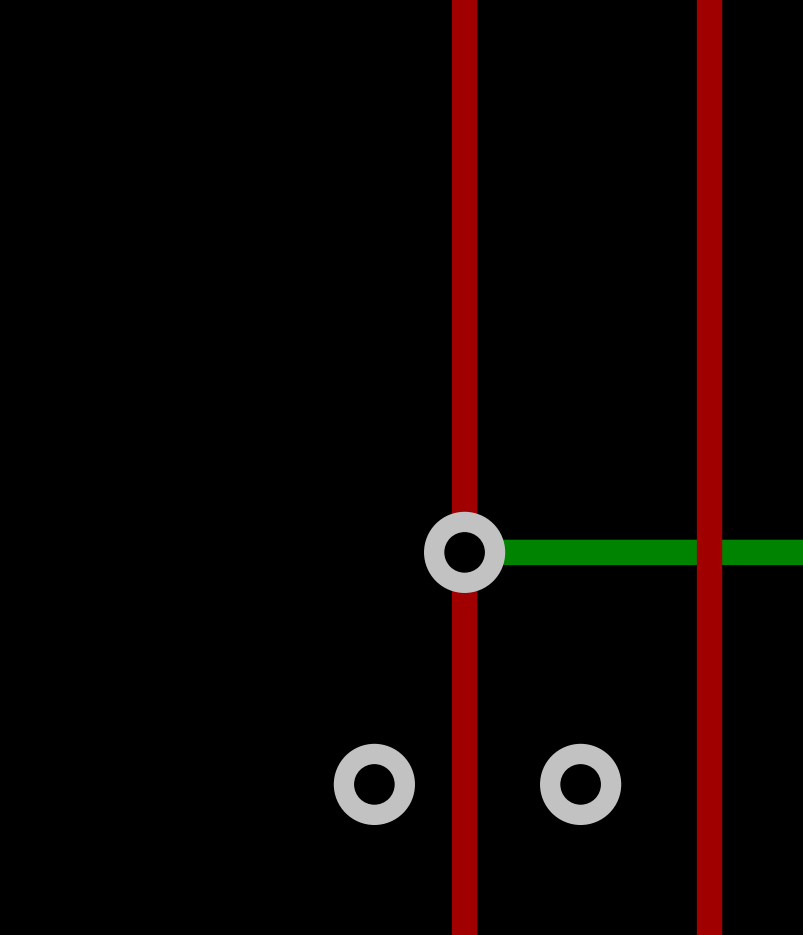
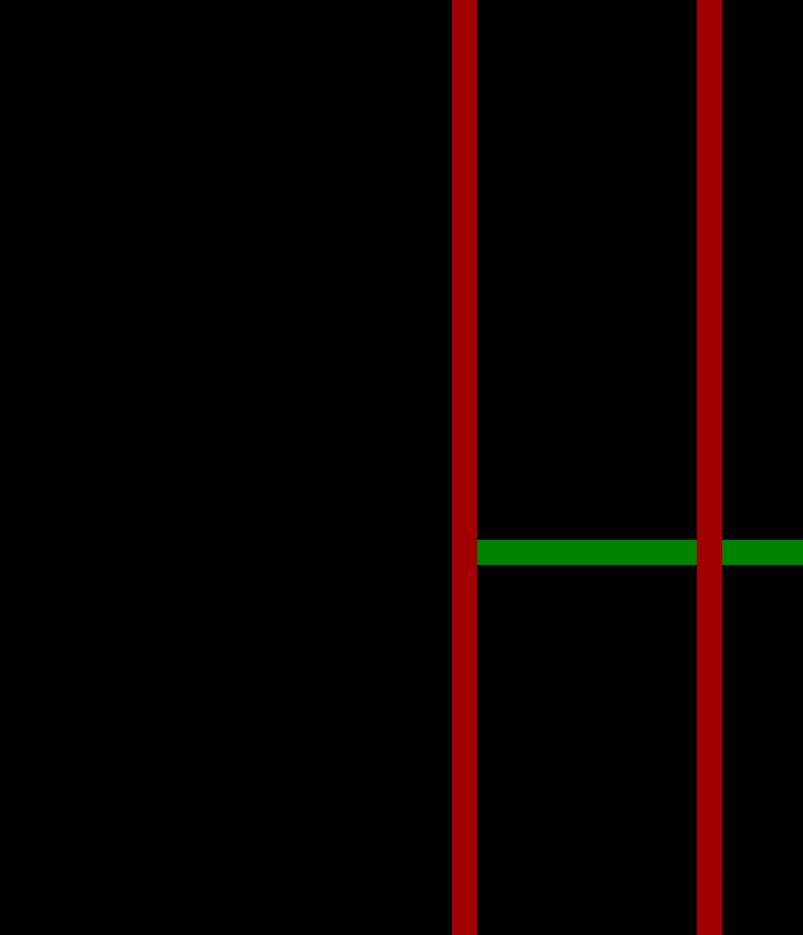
via: (464, 552) -> none
via: (374, 784) -> none
via: (580, 784) -> none

